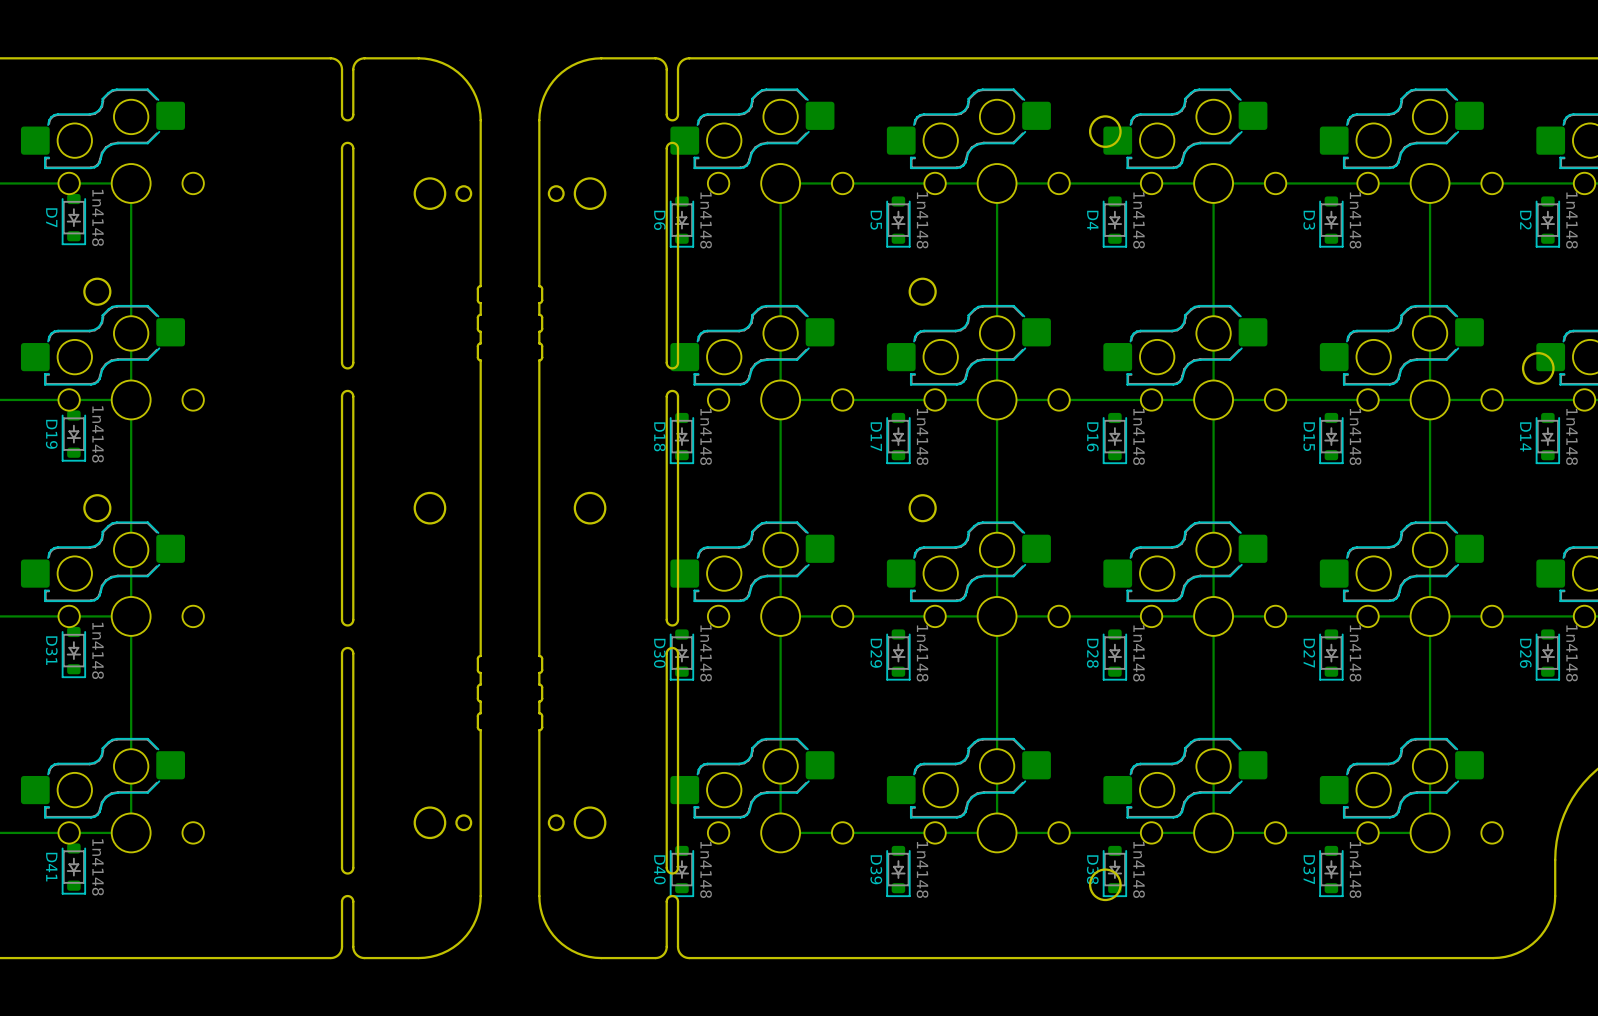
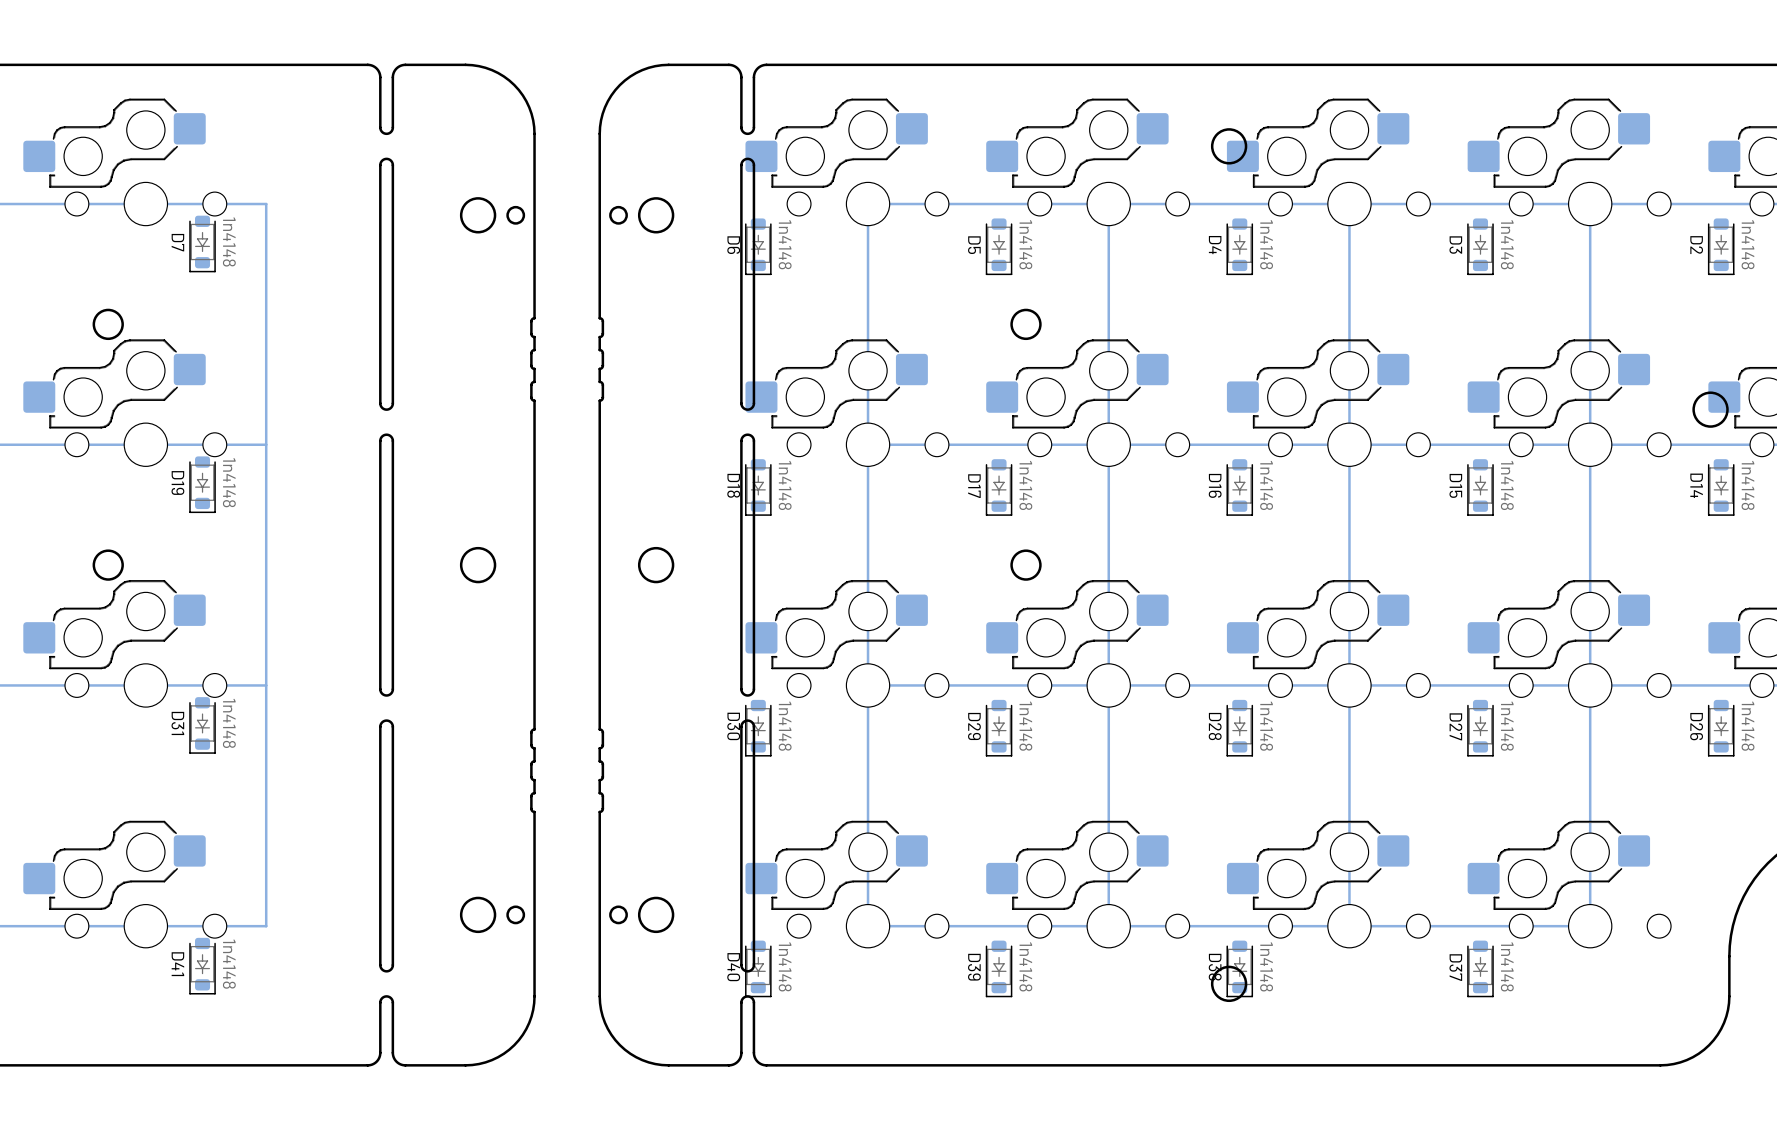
track: (131, 183) (131, 832) -> (145, 204) (266, 204) (266, 926) (145, 926)
D7 position: (73, 219) -> (202, 244)
track: none -> (266, 444) (145, 444)
D19 position: (73, 435) -> (202, 484)
track: none -> (266, 685) (145, 685)
D31 position: (73, 652) -> (202, 725)
D41 position: (73, 868) -> (202, 966)

